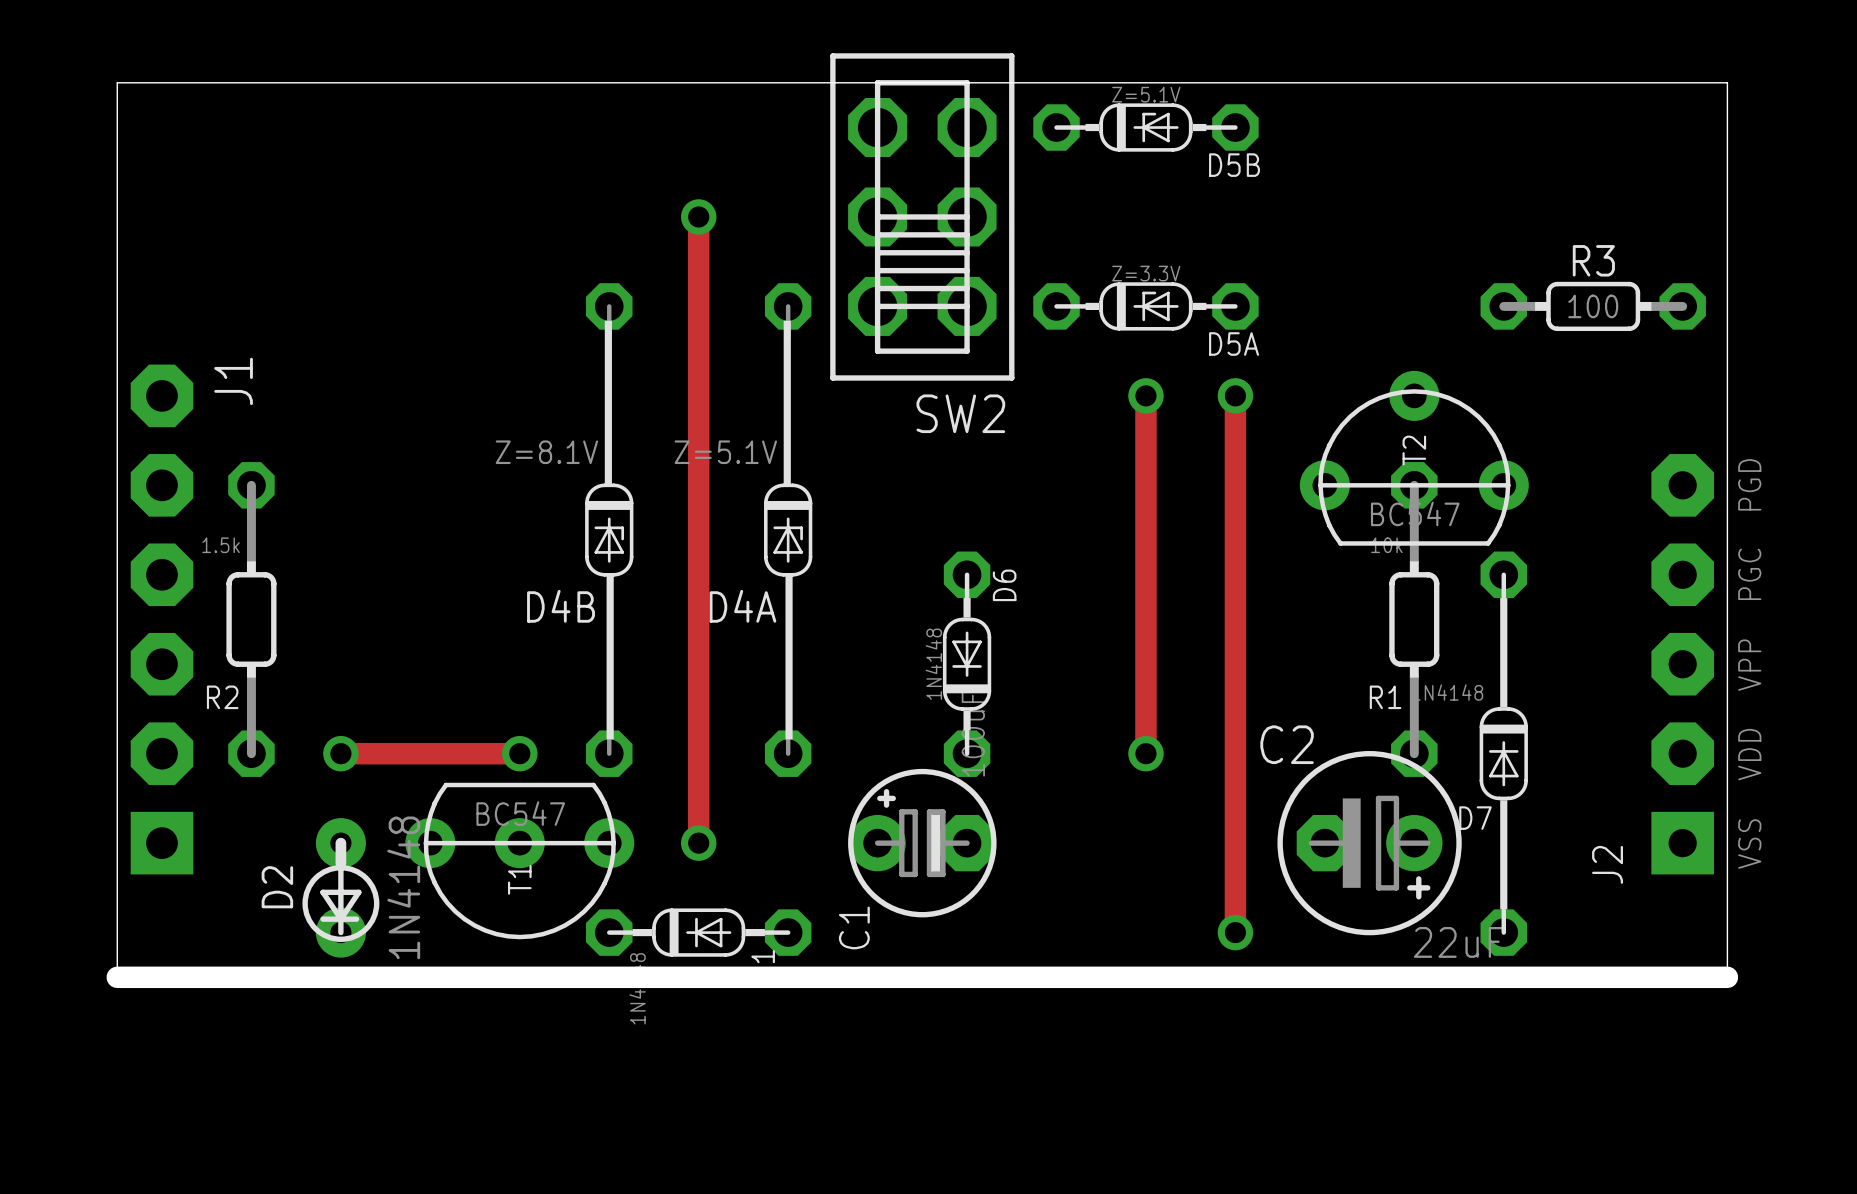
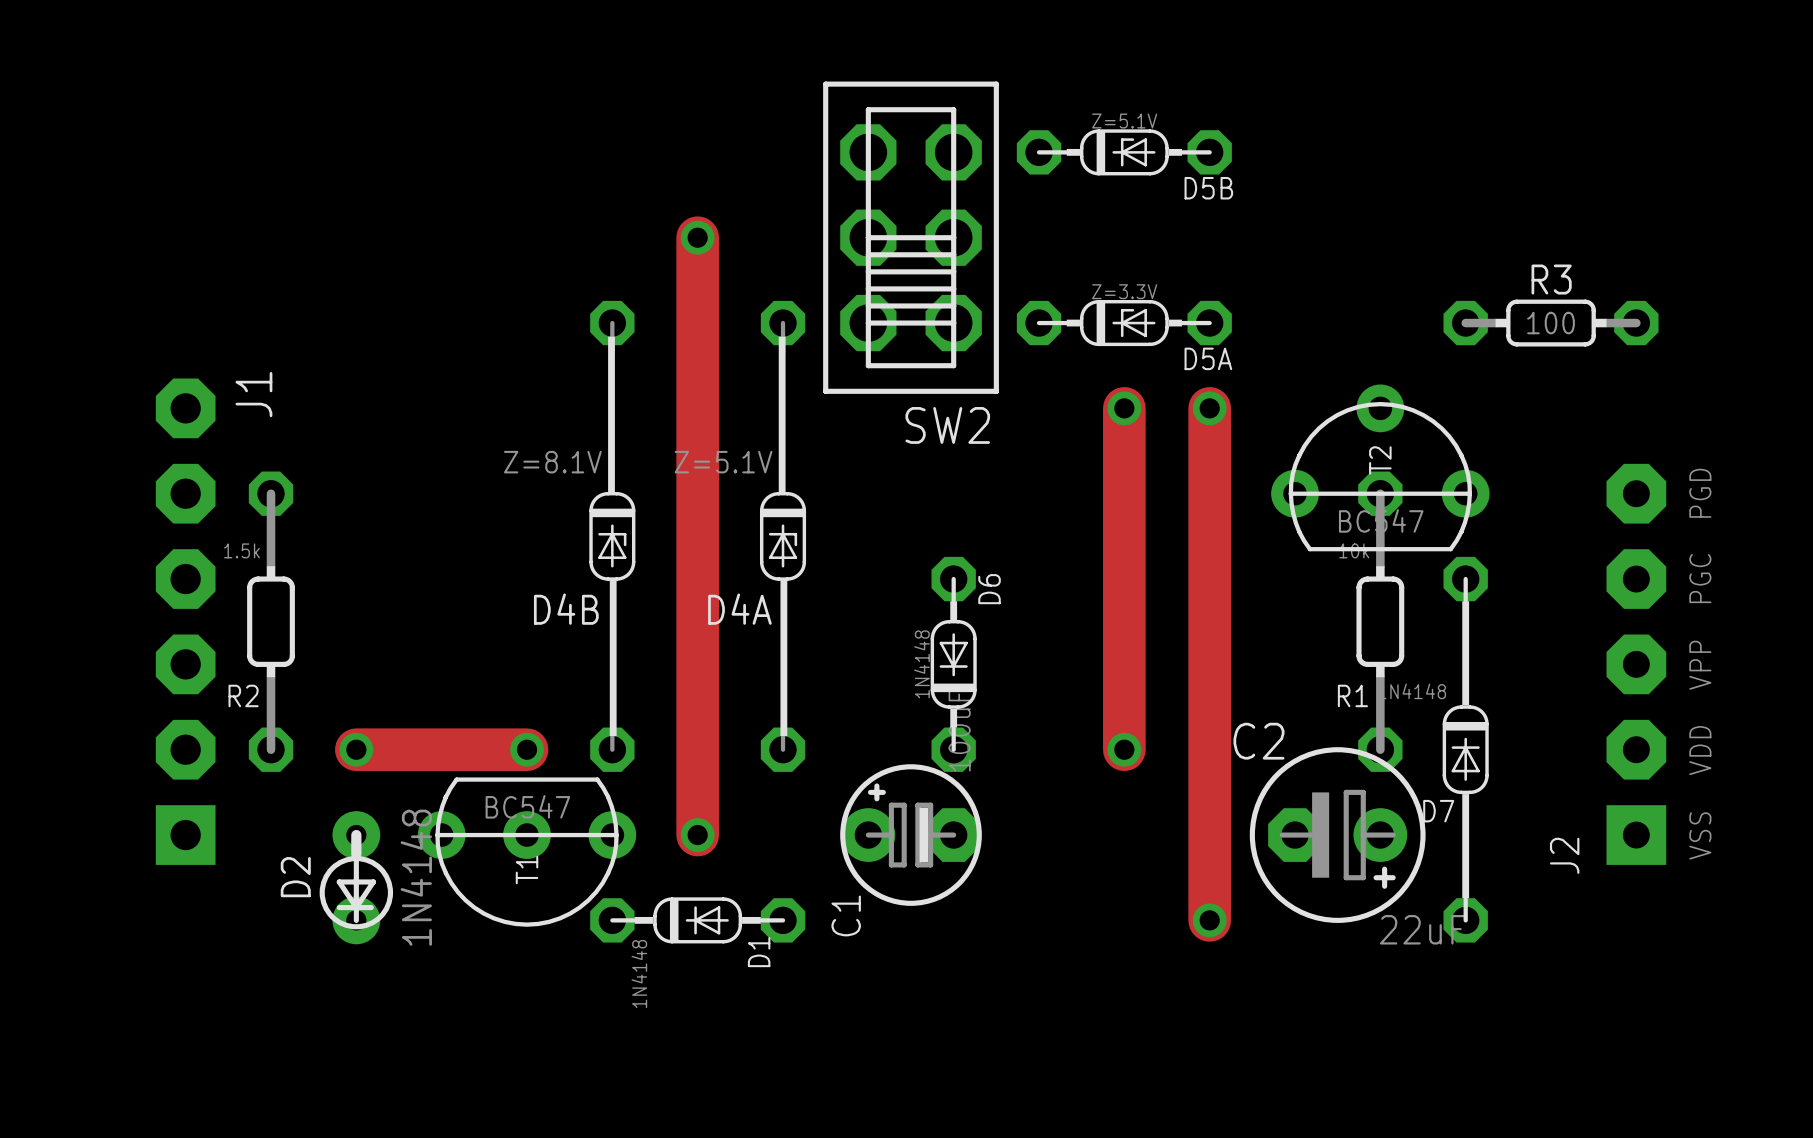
board edge: (117, 82) (1727, 82) (1727, 977) (117, 977) (117, 82) -> none
track width: thin (698, 216) (698, 843) -> thick (697, 237) (697, 835)
track width: thin (1145, 395) (1145, 753) -> thick (1124, 408) (1124, 749)
track width: thin (1235, 395) (1235, 932) -> thick (1209, 408) (1209, 920)
track width: thin (340, 753) (519, 753) -> thick (356, 749) (527, 749)

